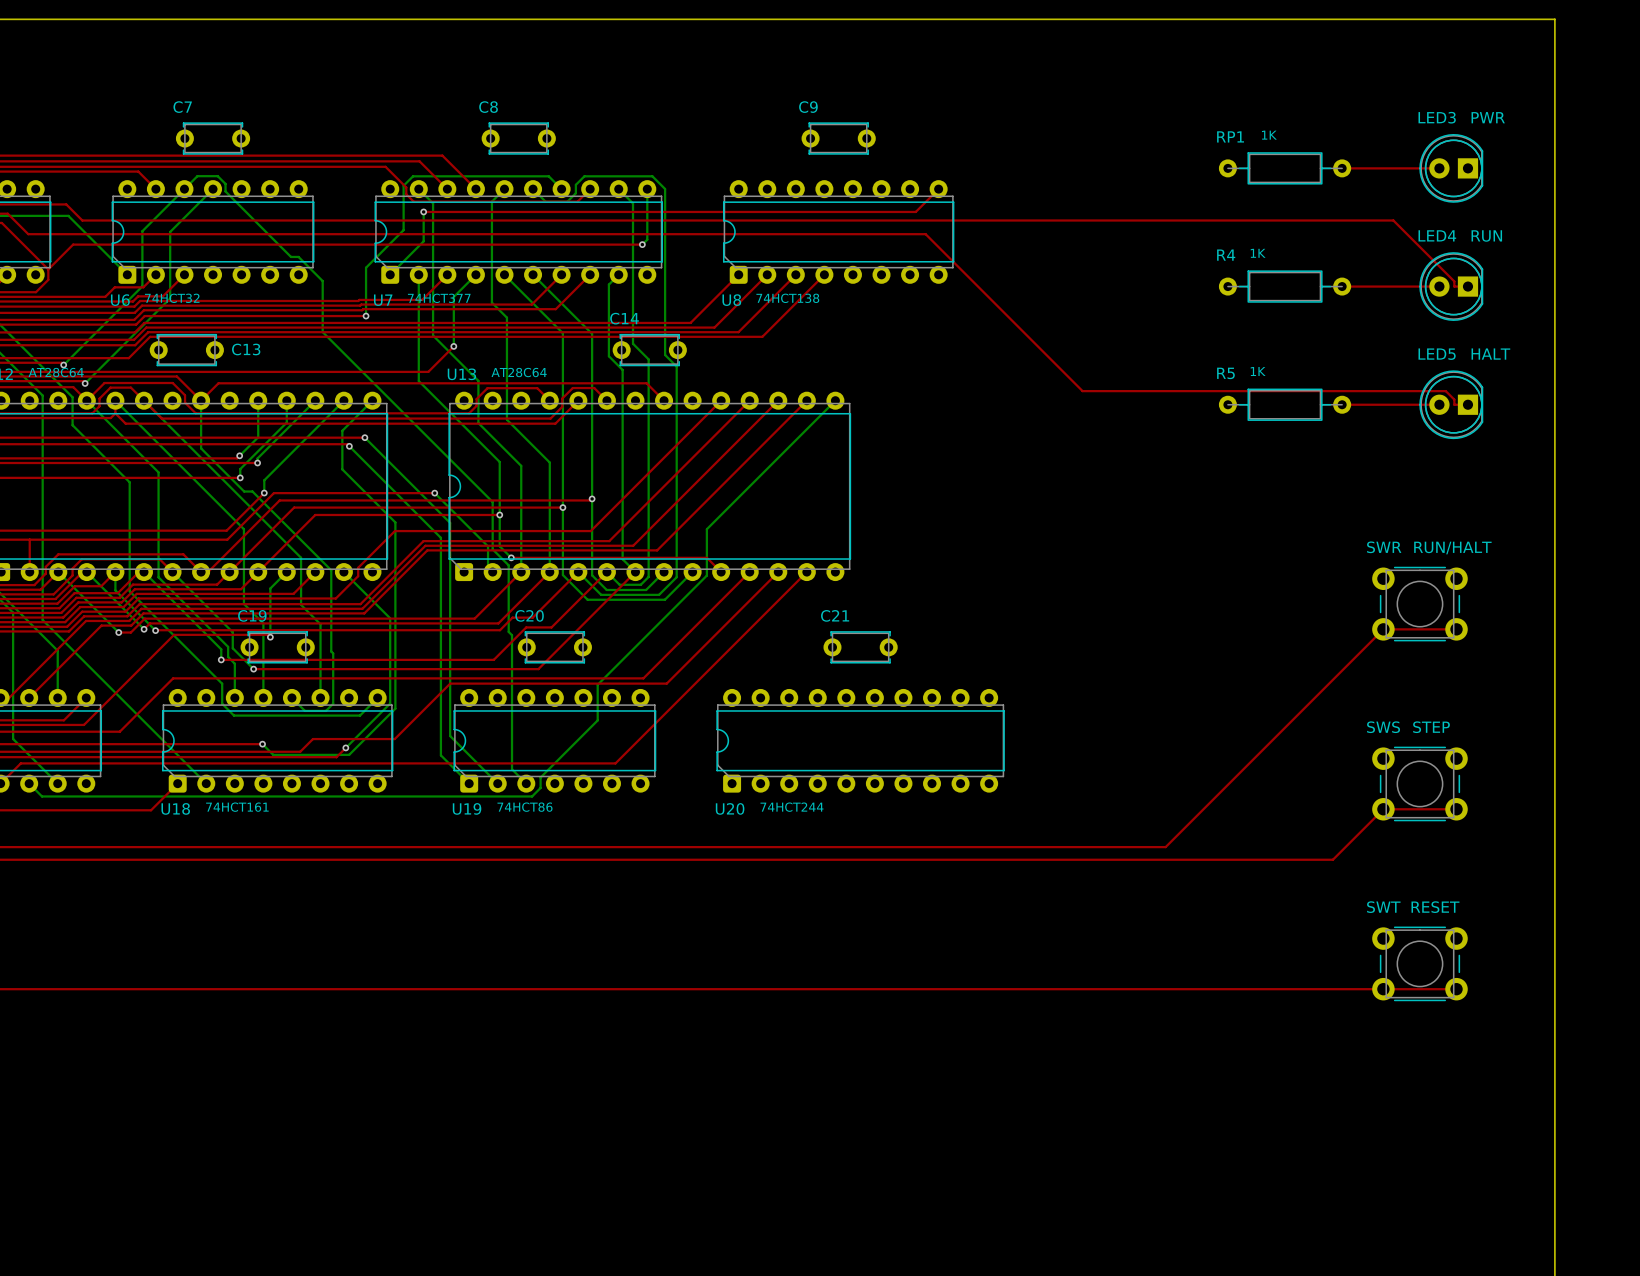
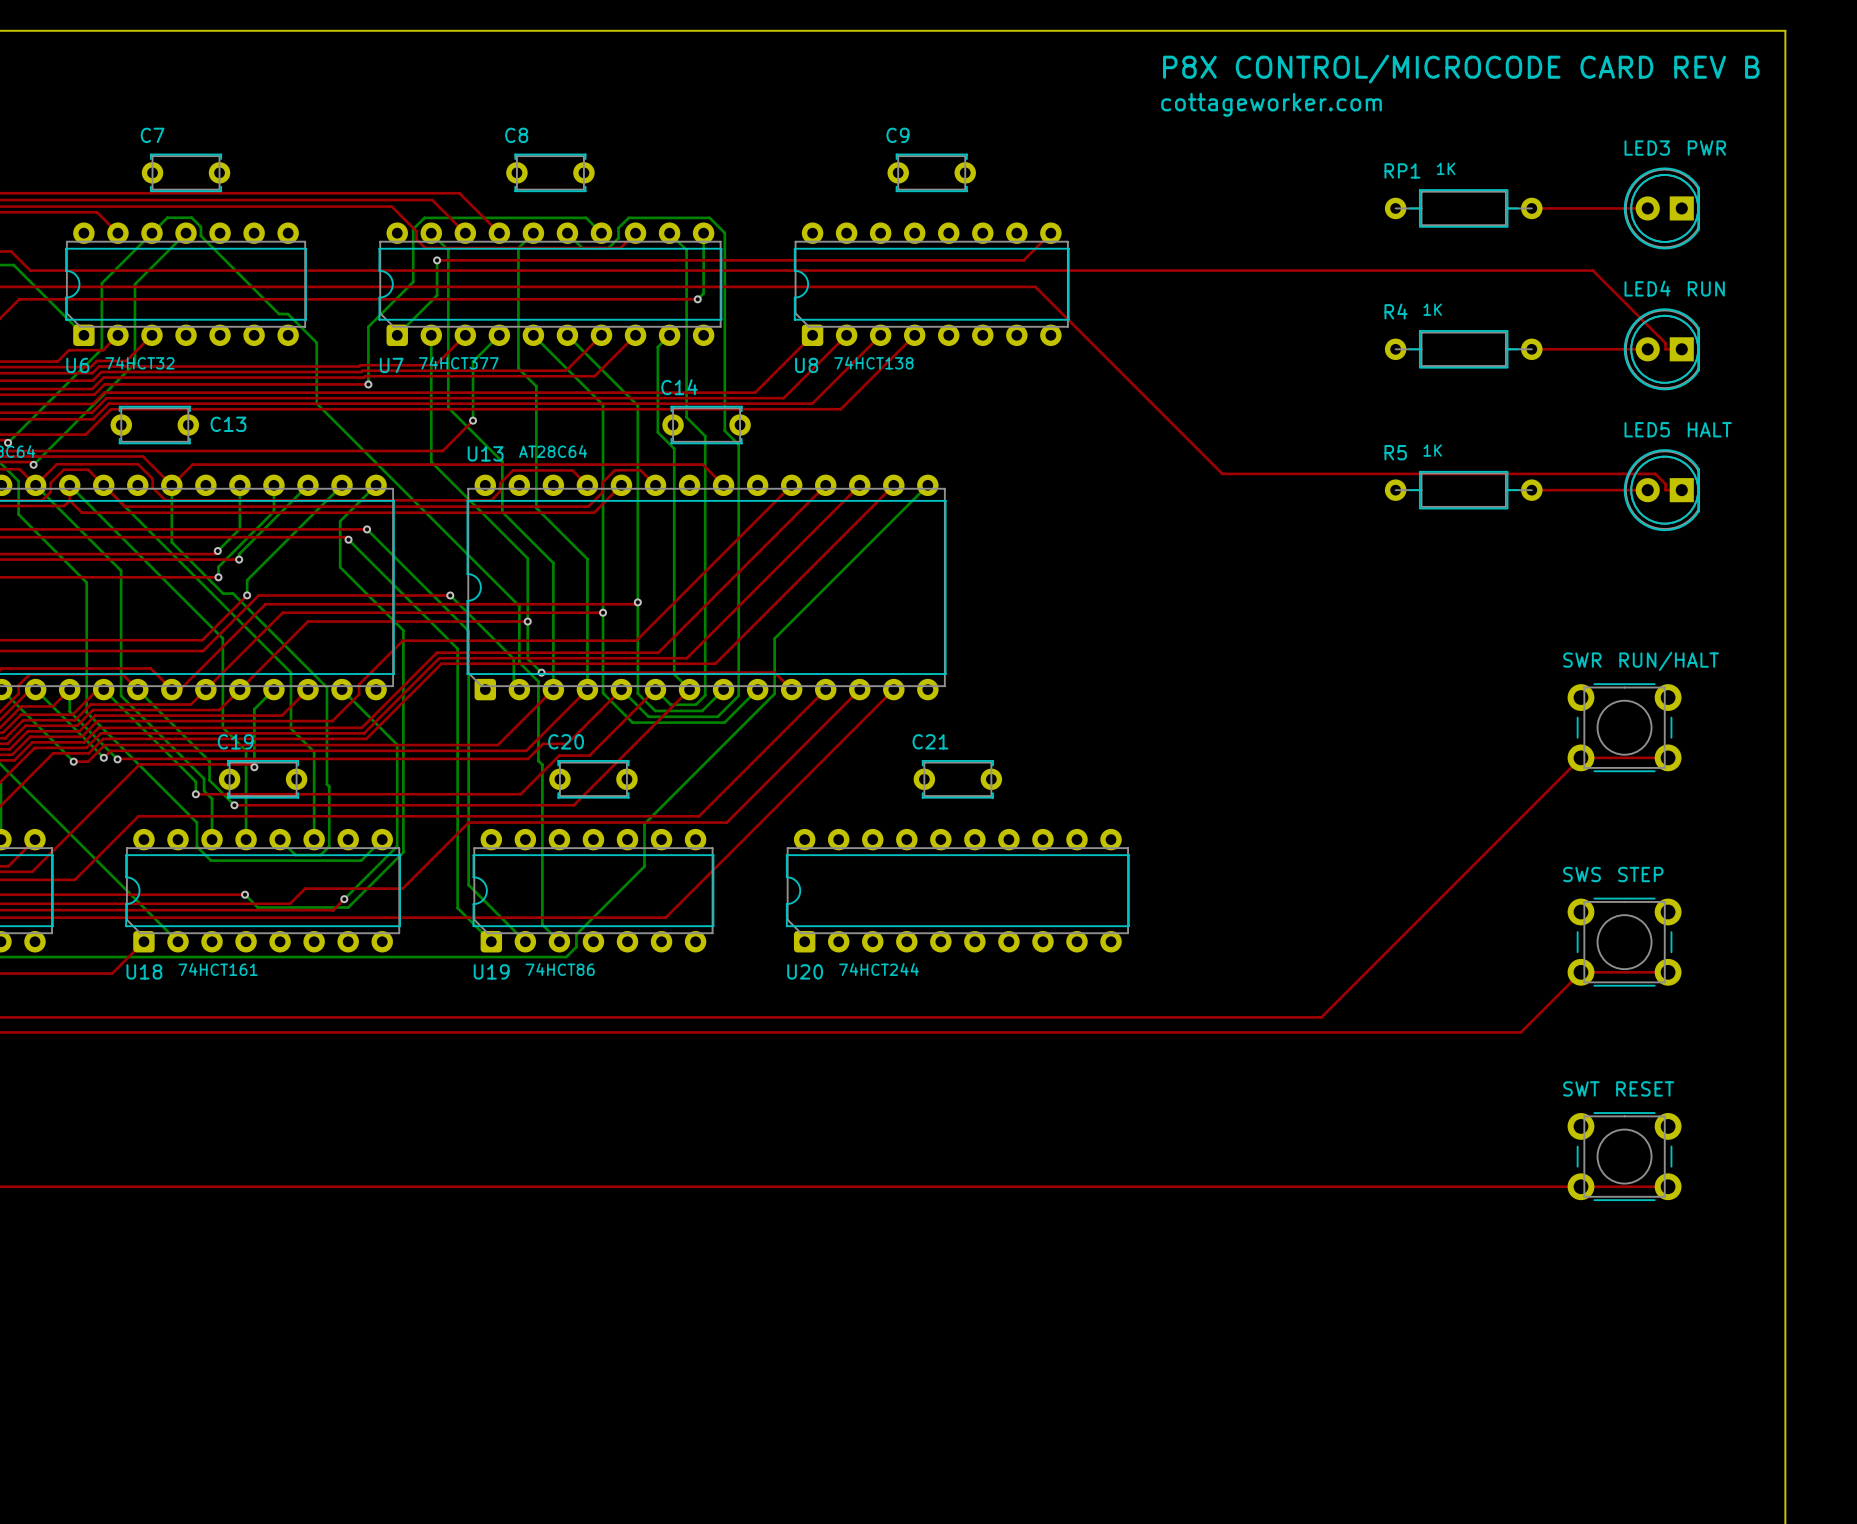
text: none -> P8X CONTROL/MICROCODE CARD REV B (1461, 69)
text: none -> cottageworker.com (1271, 104)

